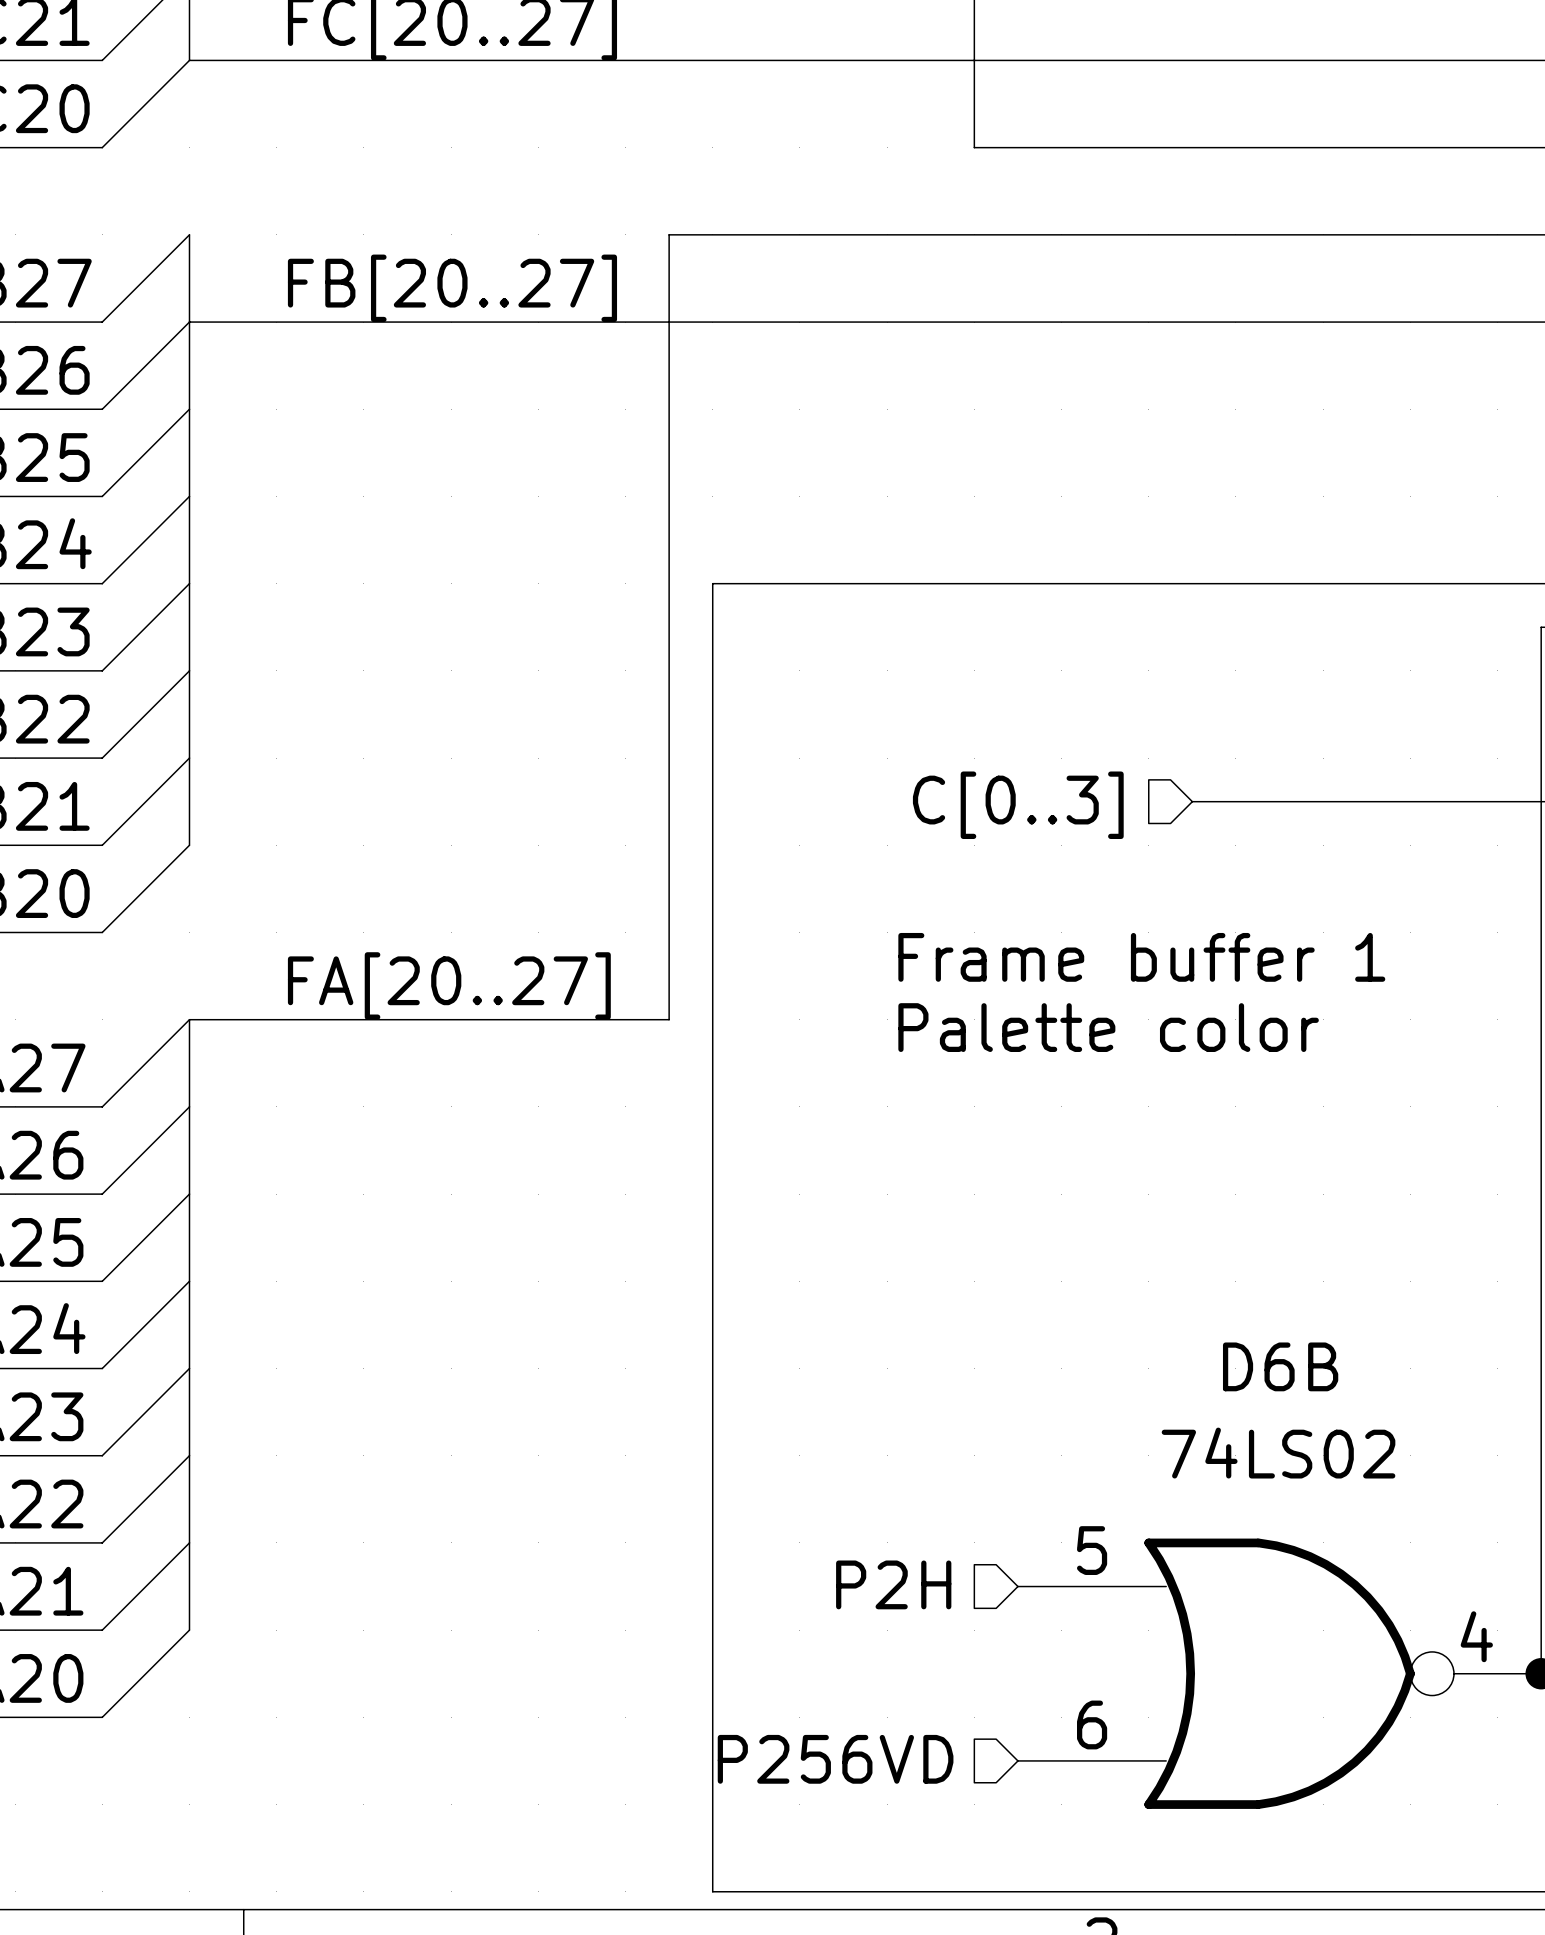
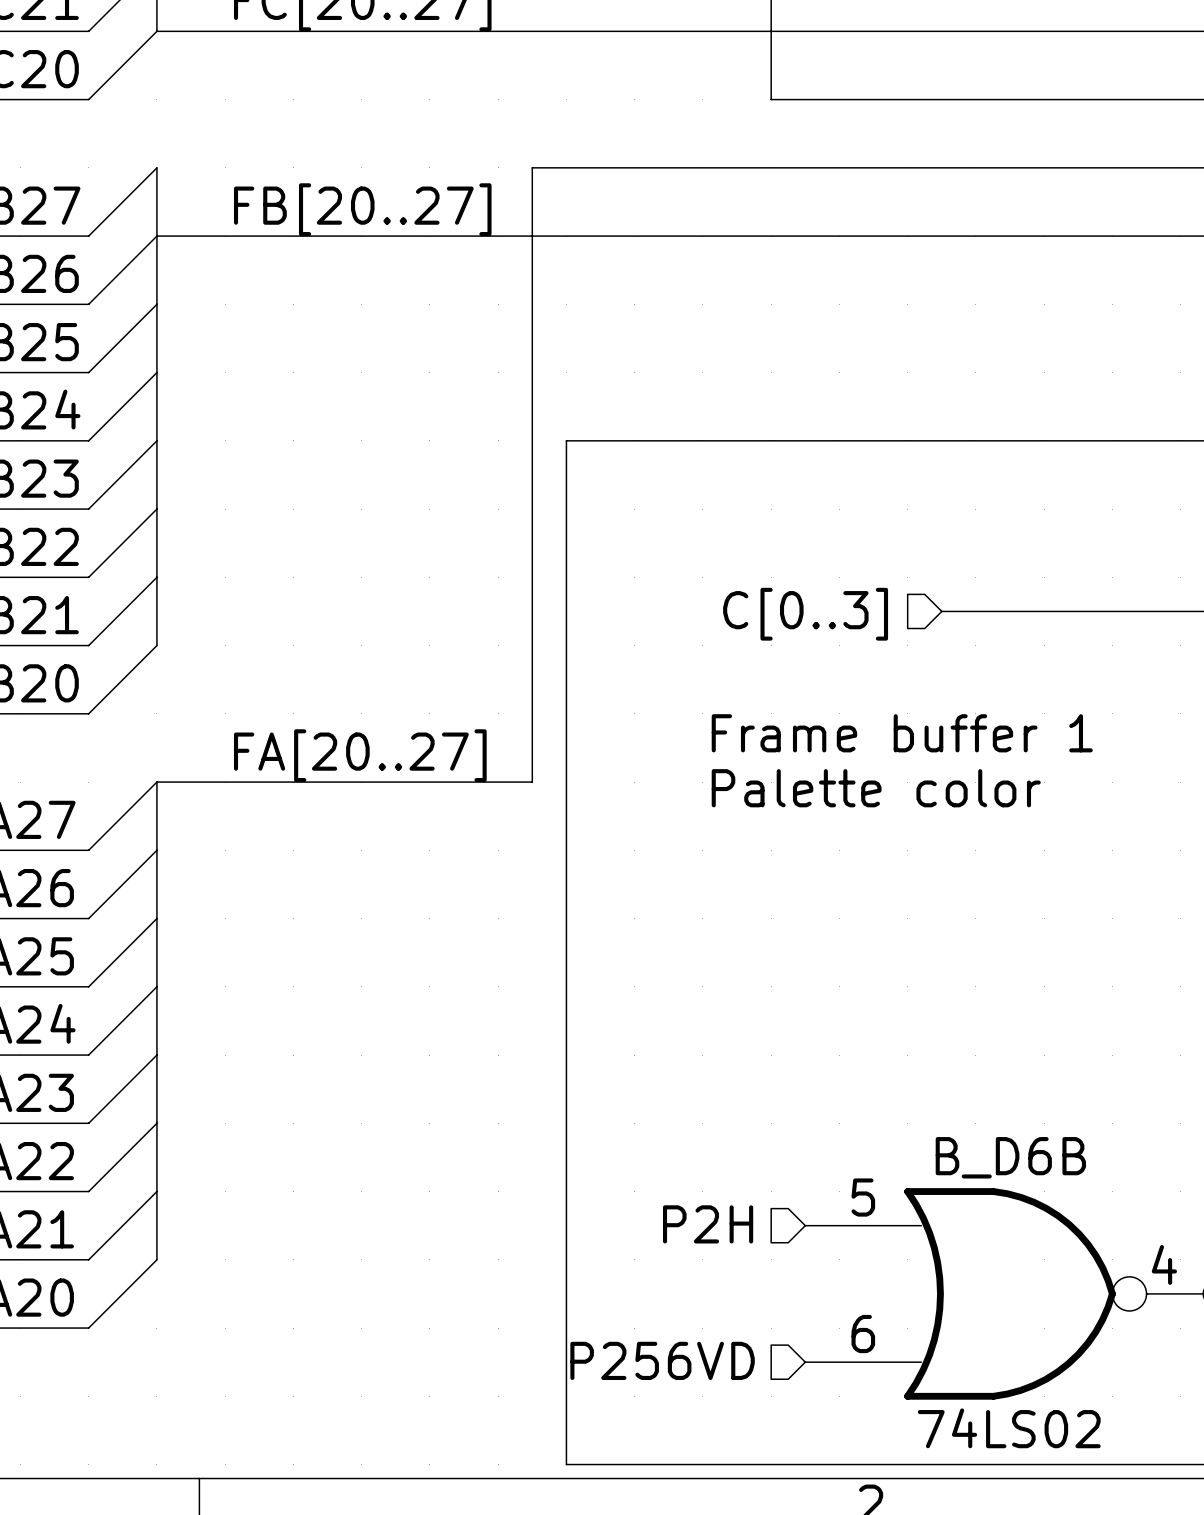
D6B name: D6B (1280, 1366) -> B_D6B (1010, 1157)
D6B value position: 74LS02 (1278, 1453) -> 74LS02 (1009, 1428)

